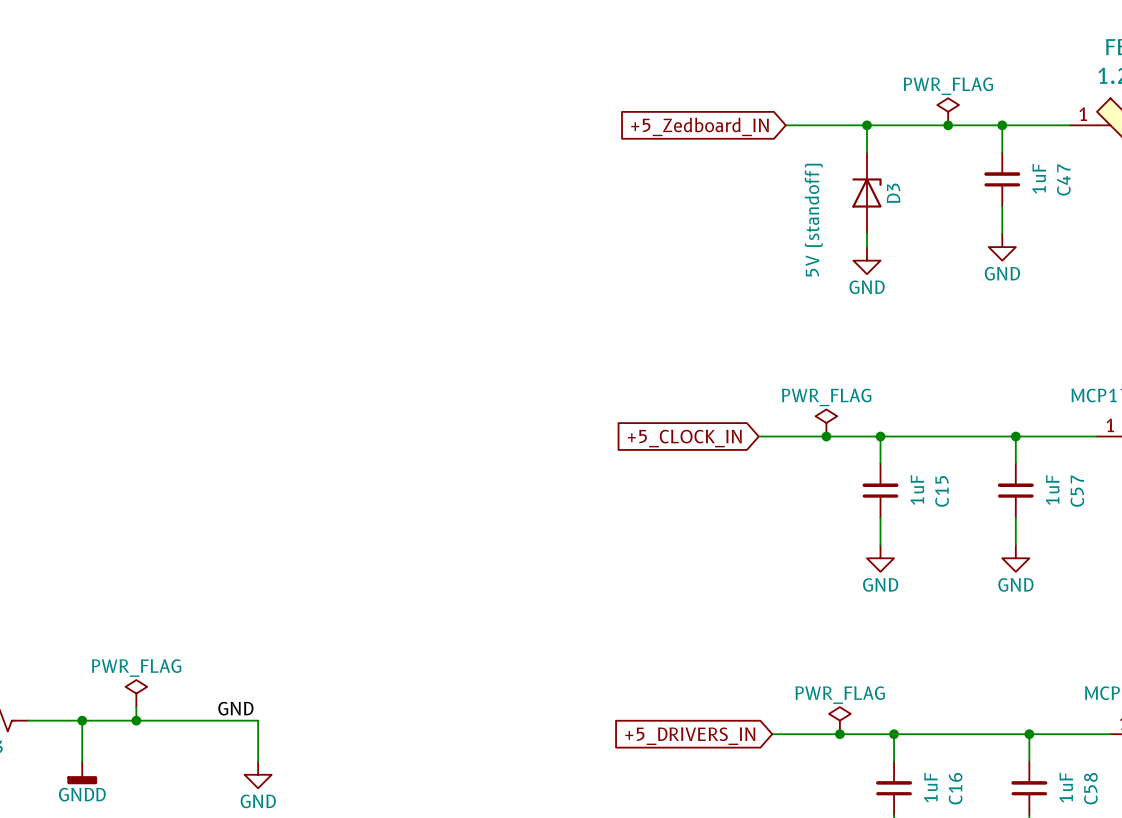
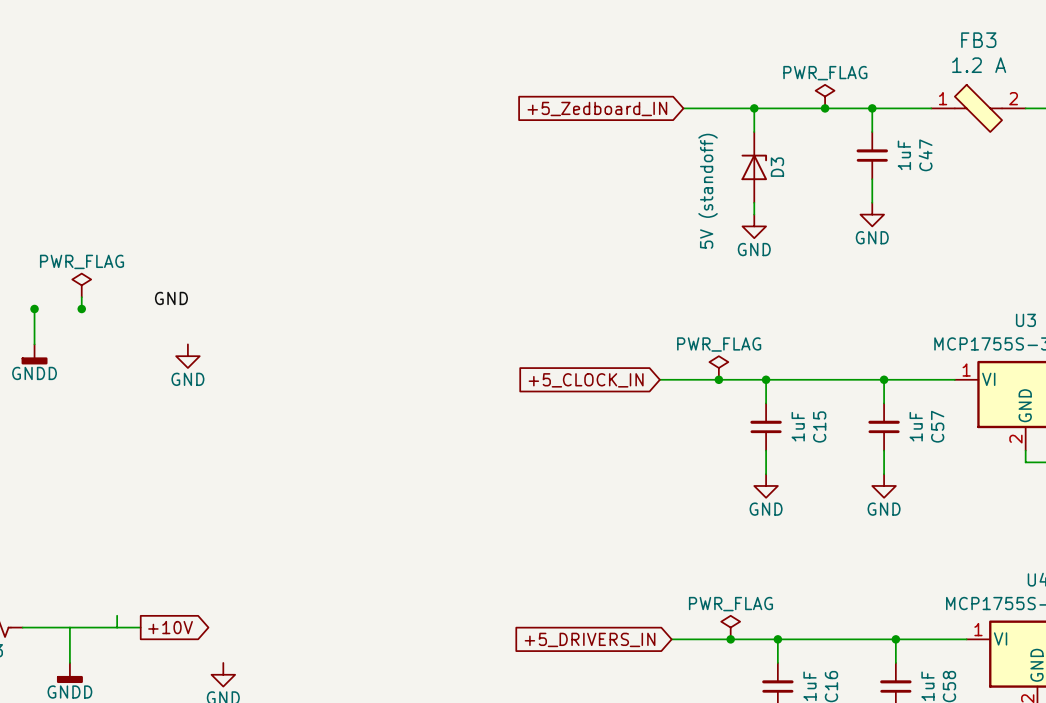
power symbol: none -> PWR_FLAG (81, 285)
wire: none -> (81, 297) (81, 308)
label: none -> GND (171, 298)
wire: none -> (34, 308) (34, 344)
junction: none -> (34, 308)
junction: none -> (81, 308)
power symbol: none -> GNDD (34, 354)
power symbol: none -> GND (187, 356)
power symbol: PWR_FLAG (136, 693) -> none
label: GND (235, 708) -> none
junction: (82, 720) -> none
junction: (136, 720) -> none
wire: (163, 720) (258, 720) (258, 761) -> none
global label: none -> +10V (170, 627)

